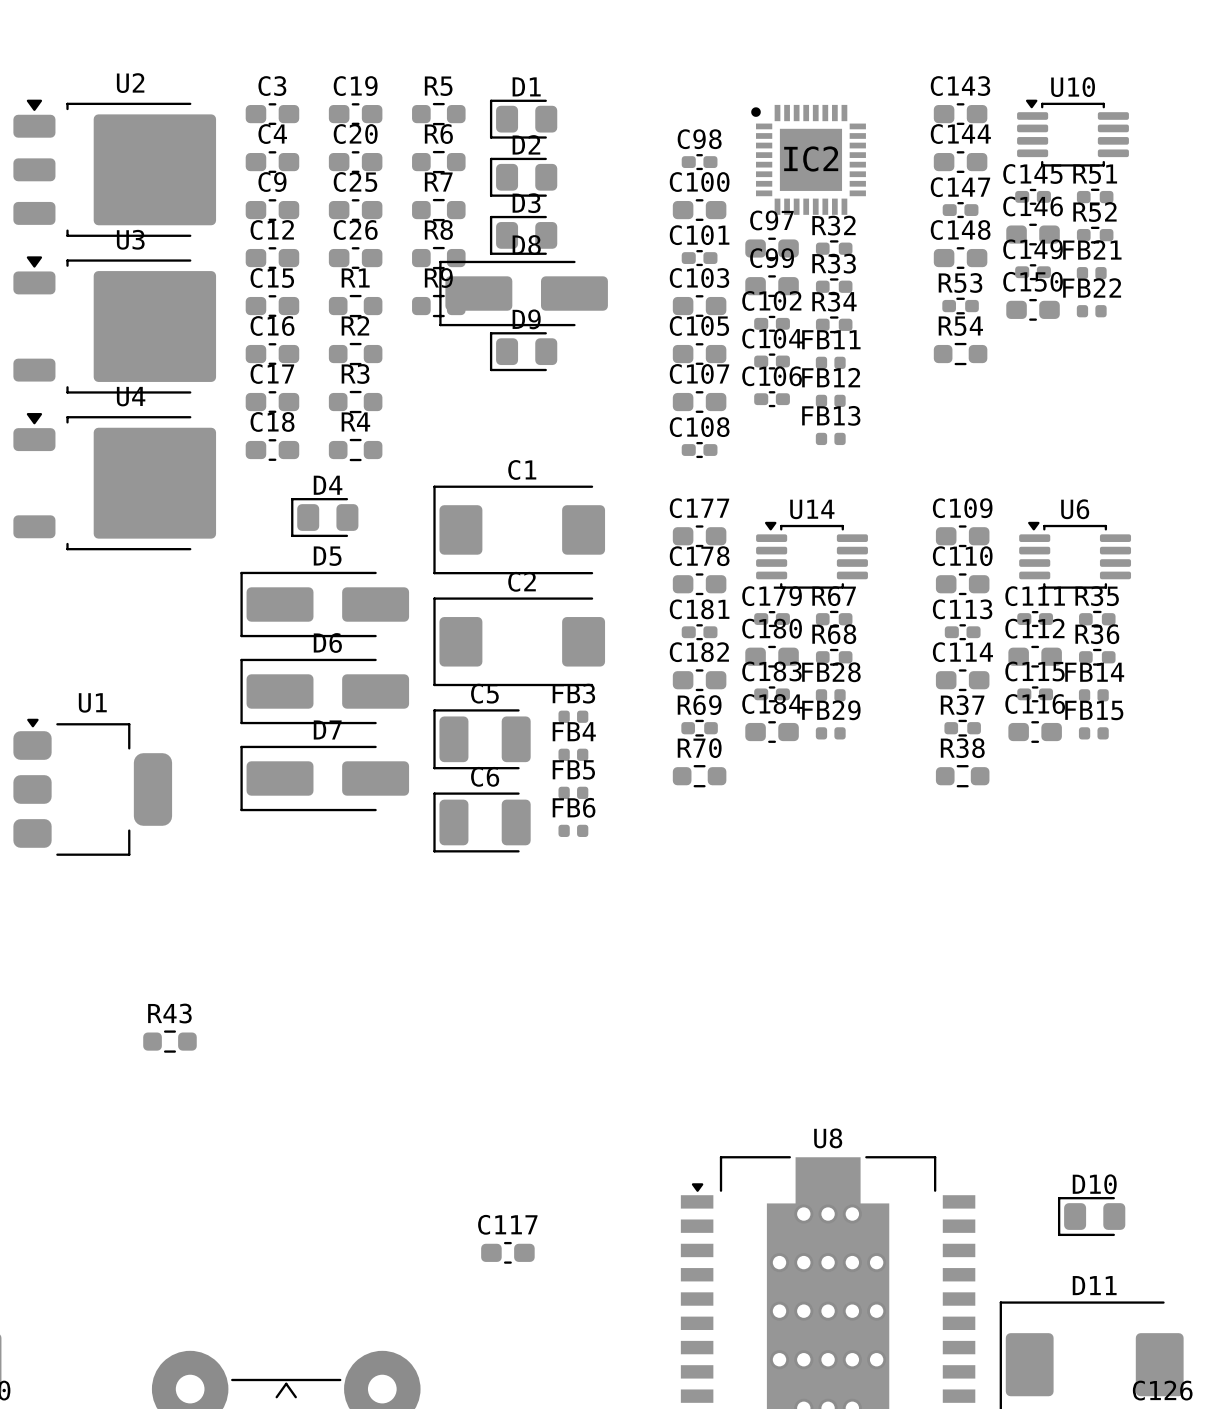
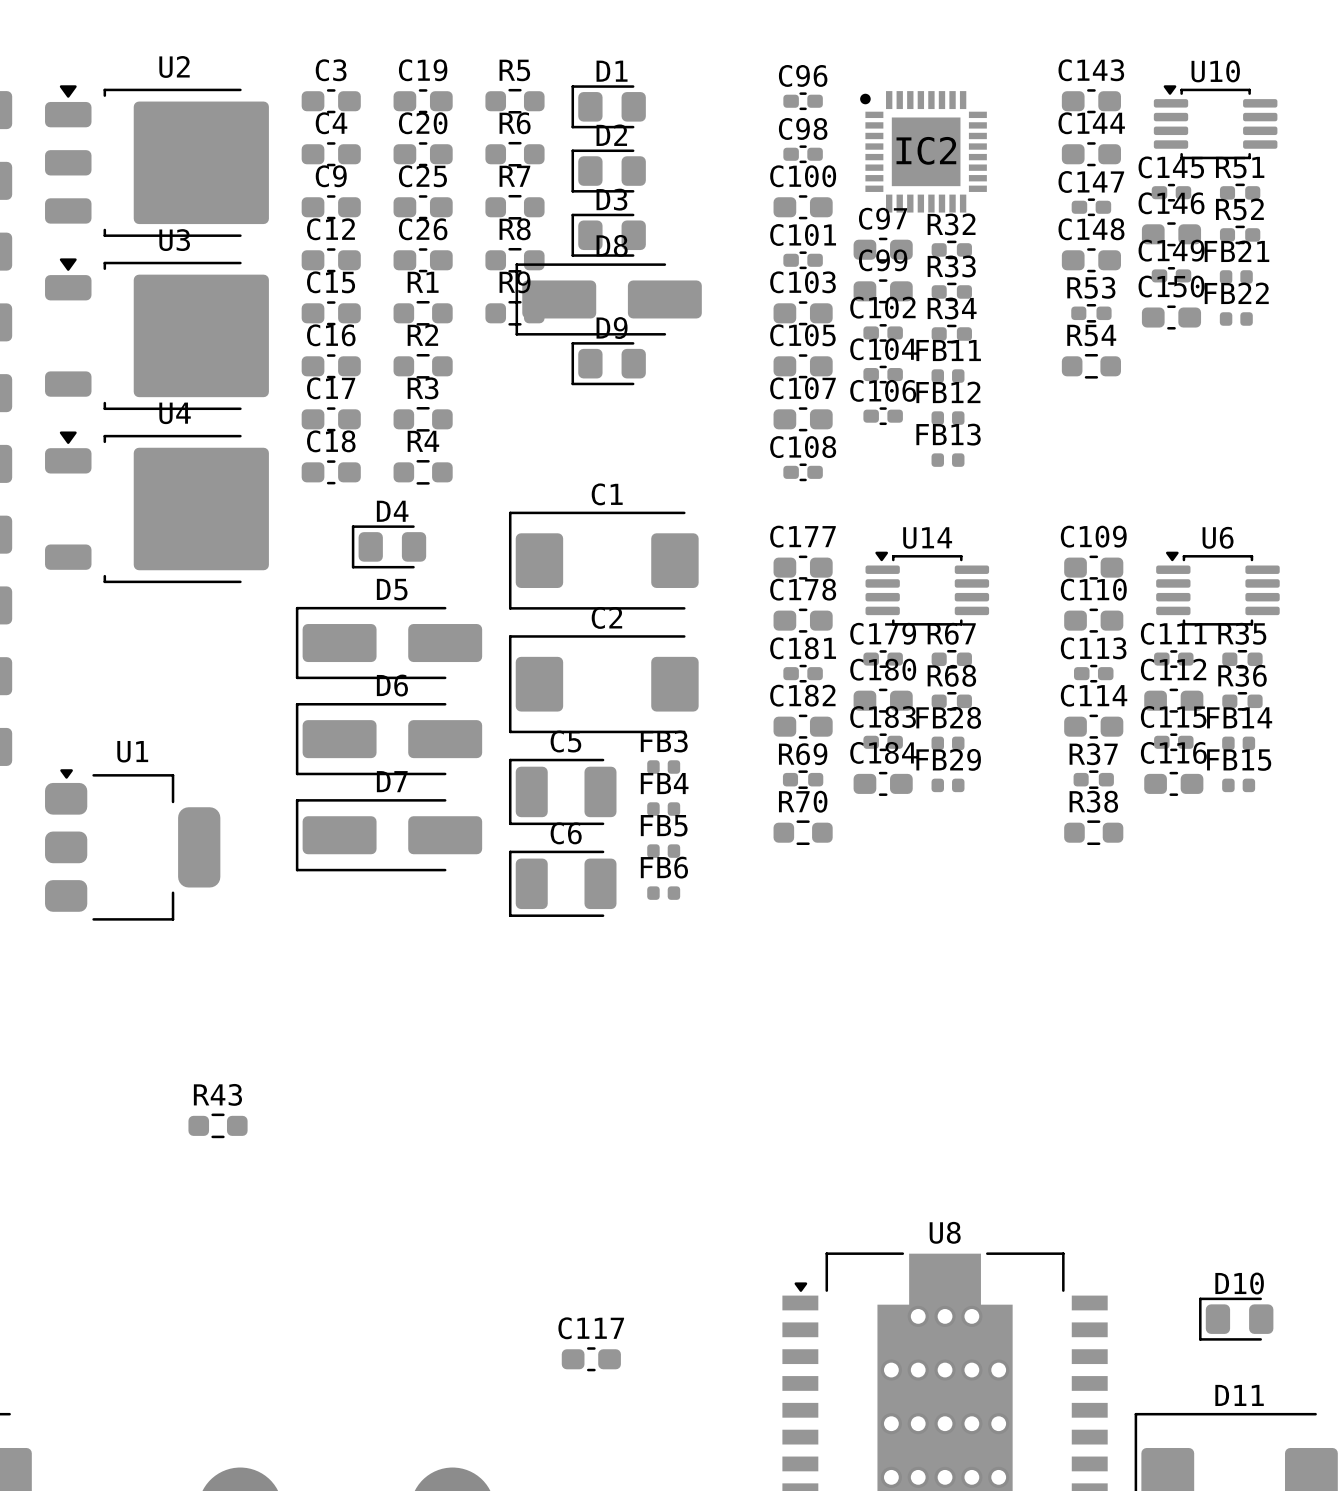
C96: none -> (803, 101)

